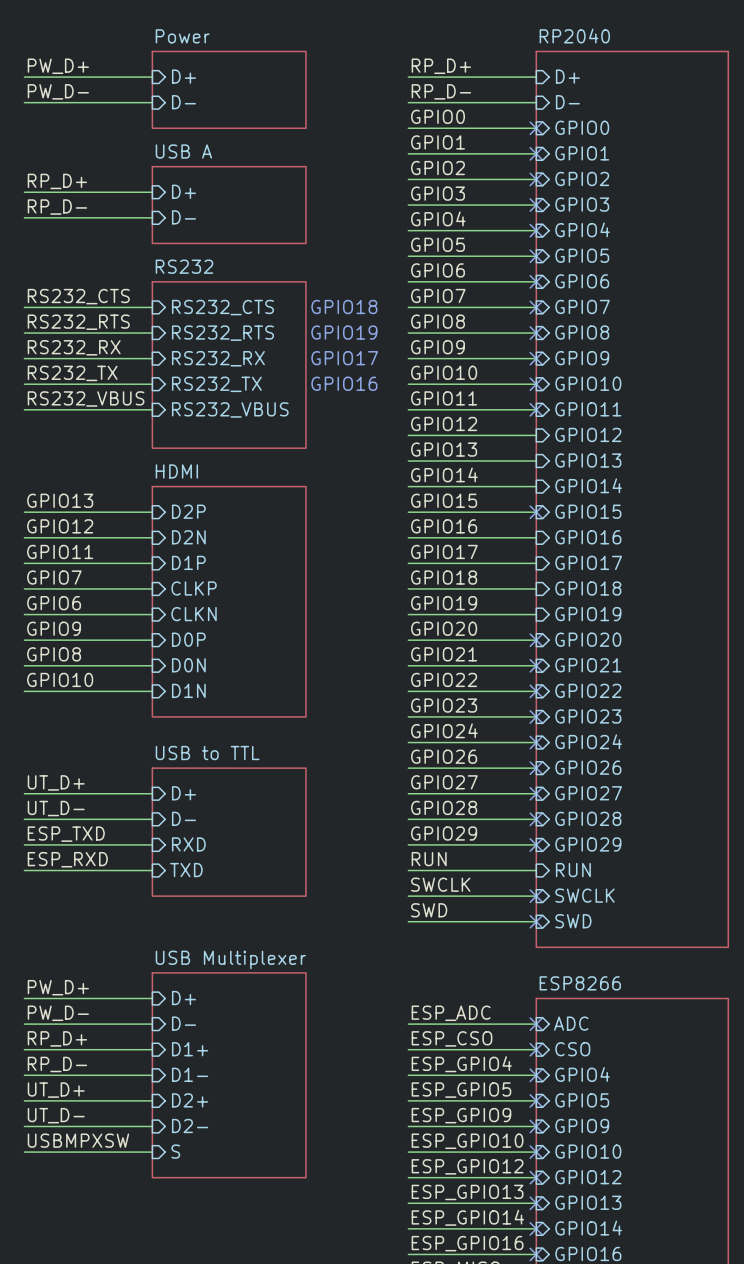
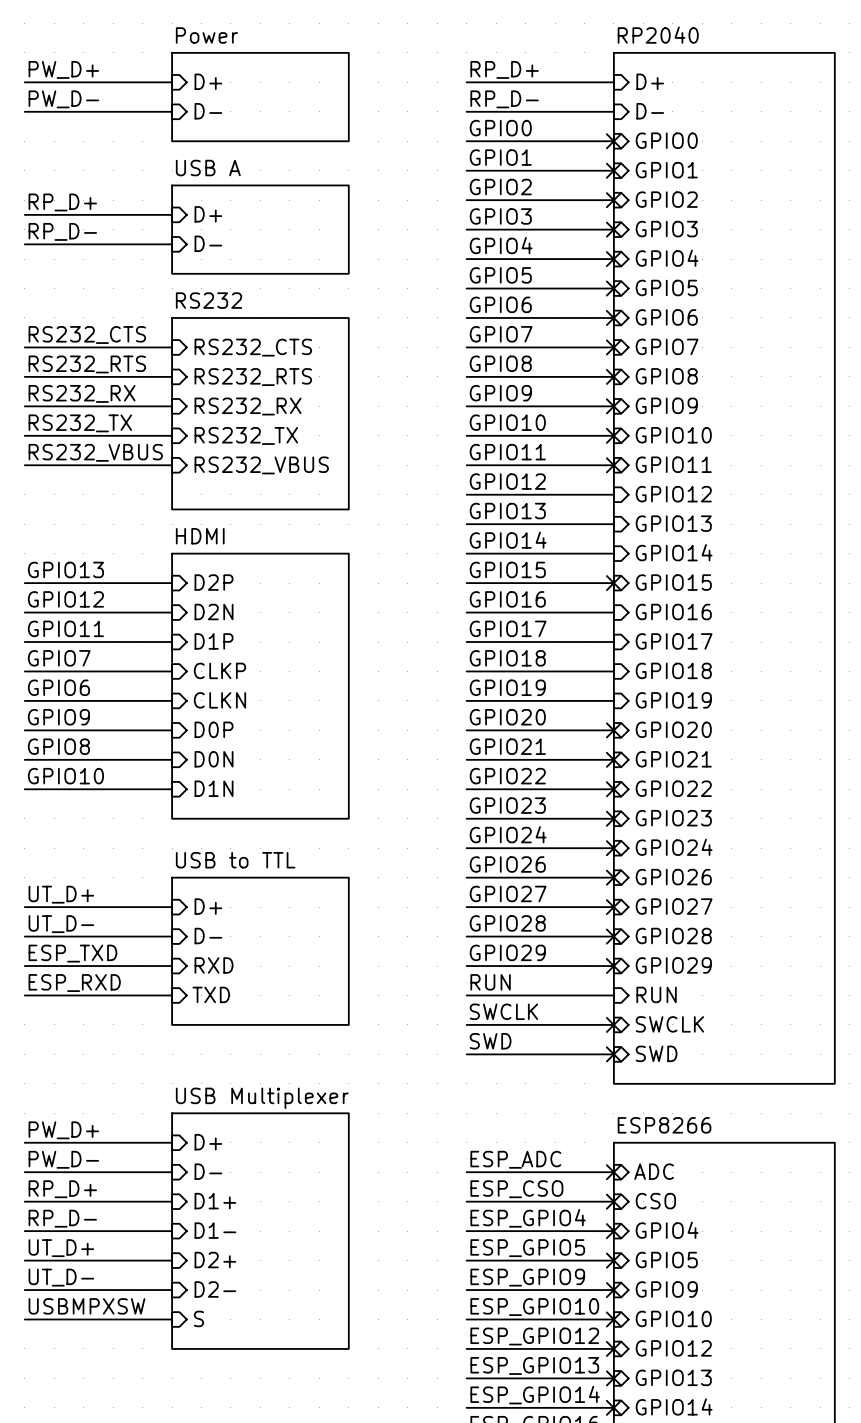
text: GPIO18 (344, 306) -> none
text: GPIO19 (344, 332) -> none
text: GPIO17 (344, 358) -> none
text: GPIO16 (344, 383) -> none

